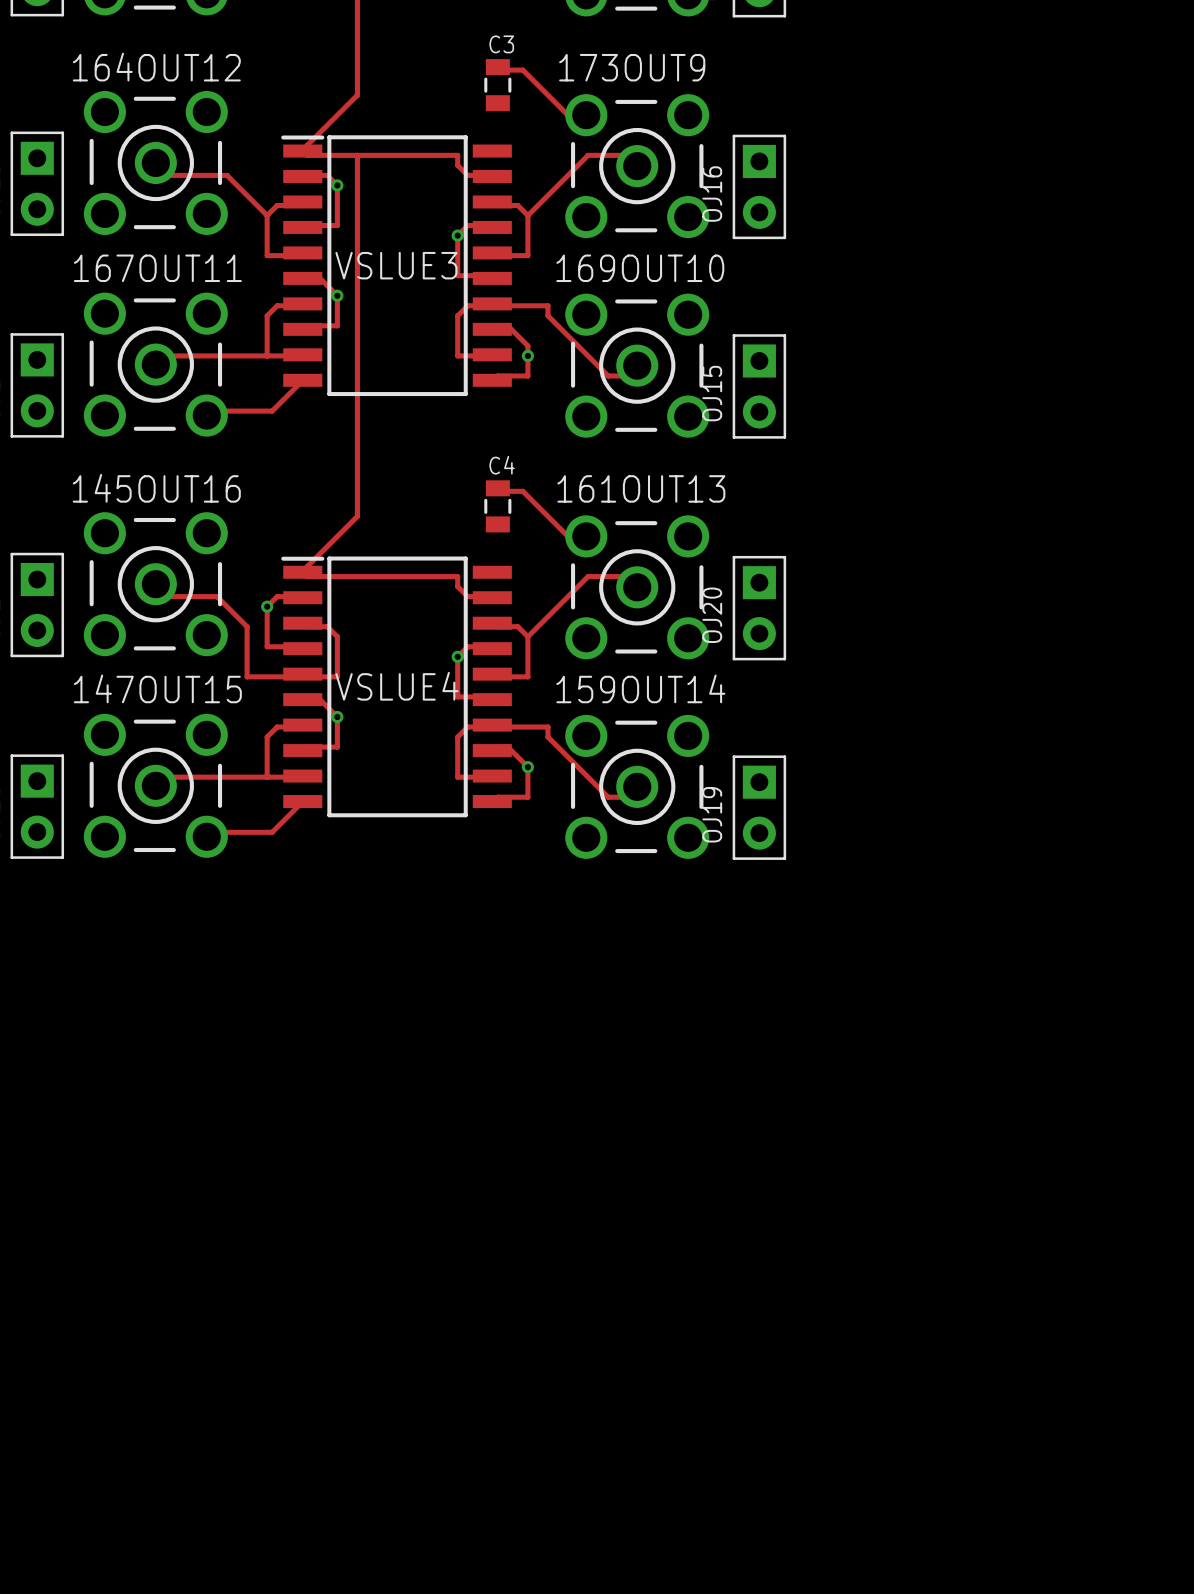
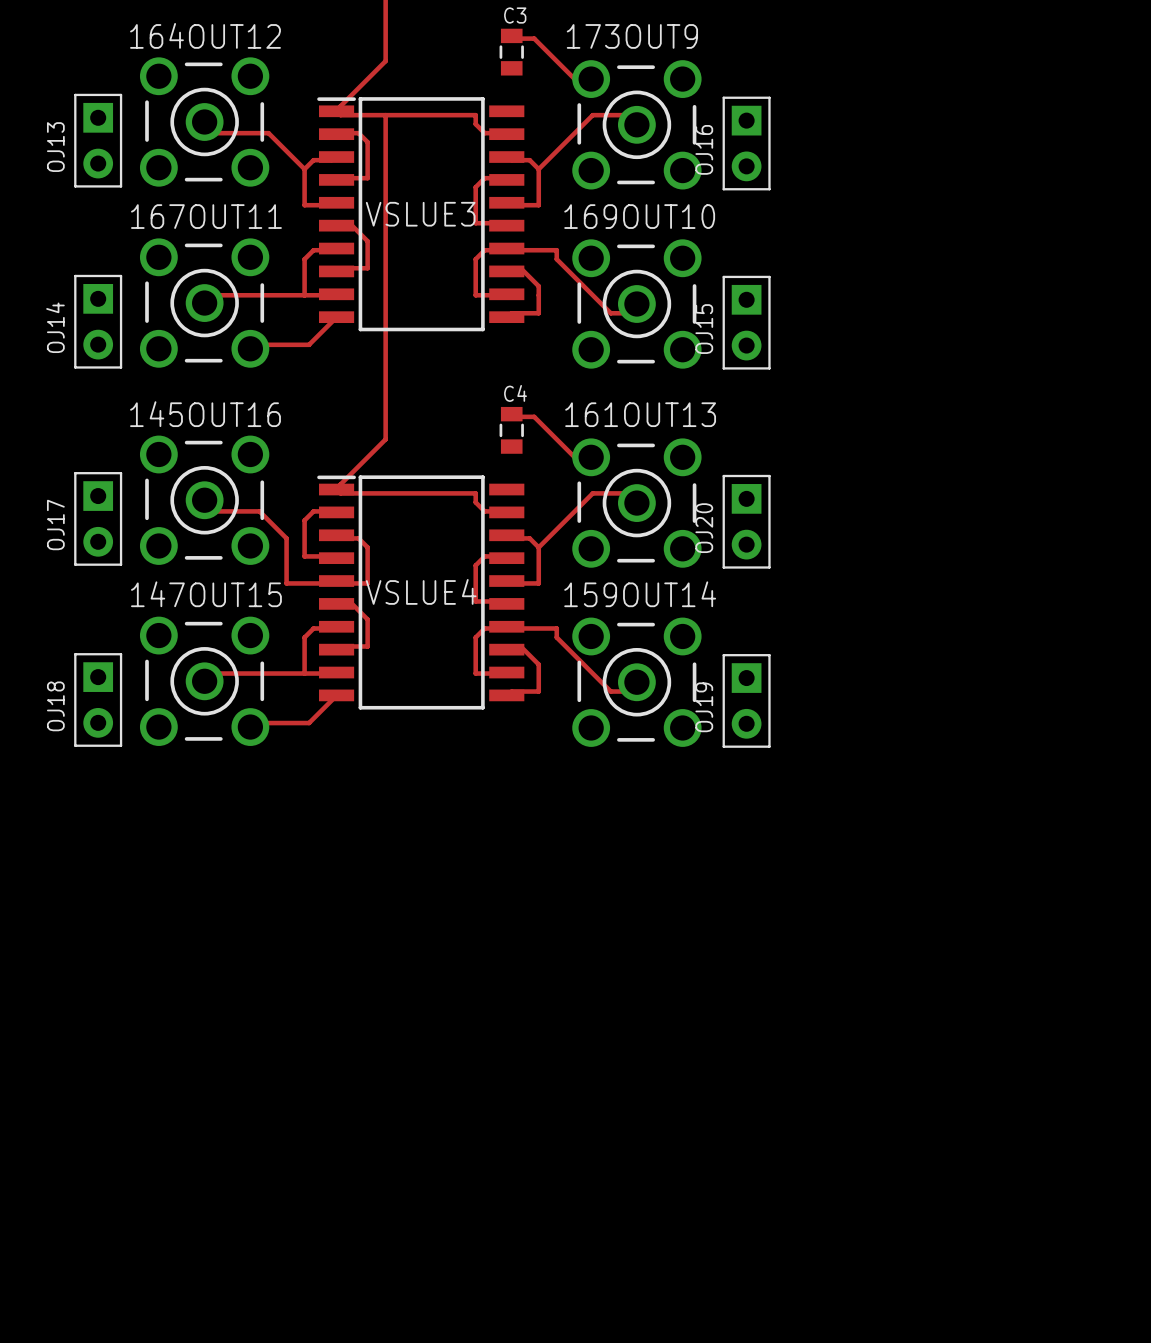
via: (337, 185) -> none
via: (457, 235) -> none
via: (337, 295) -> none
via: (527, 355) -> none
via: (267, 606) -> none
via: (457, 656) -> none
via: (337, 716) -> none
via: (527, 767) -> none

